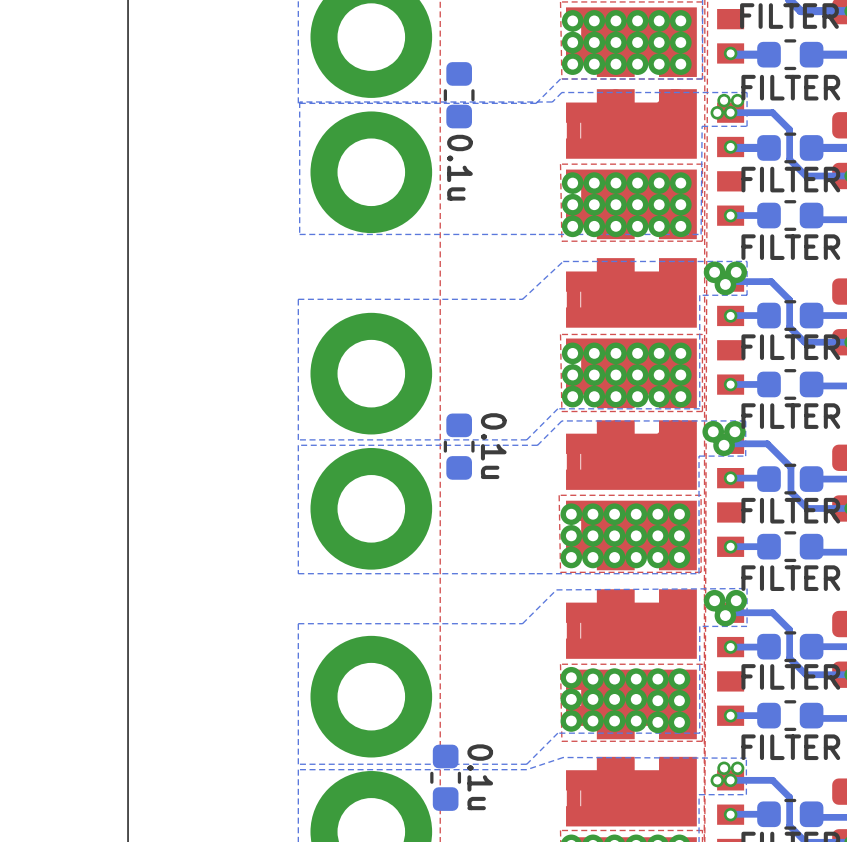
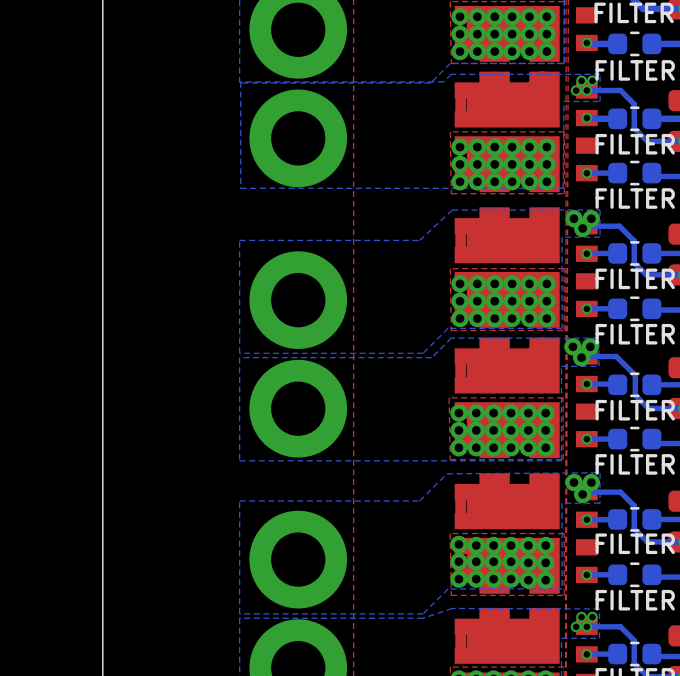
part: 0.1u (459, 95) -> none
part: 0.1u (459, 446) -> none
part: 0.1u (445, 777) -> none

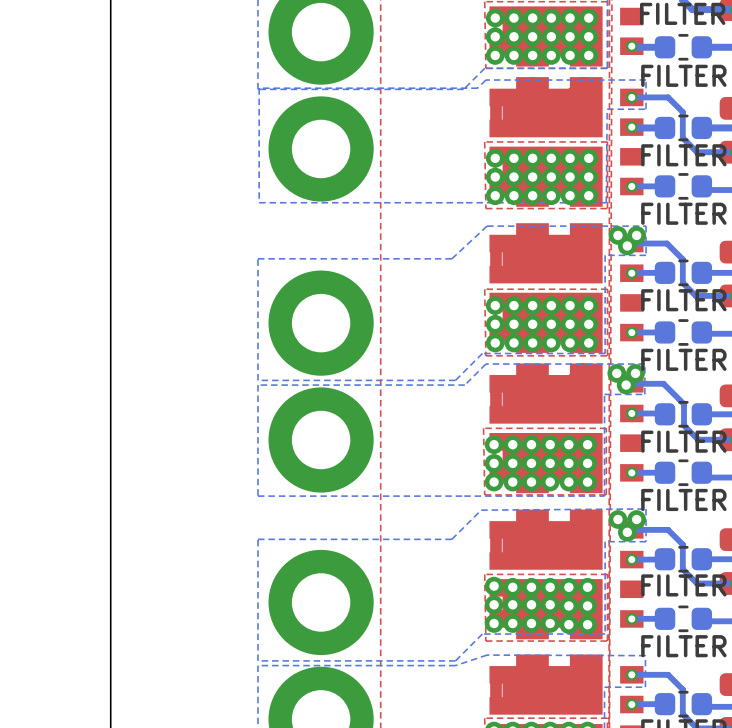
via: (581, 80) -> none
via: (592, 80) -> none
via: (576, 90) -> none
via: (581, 617) -> none
via: (592, 617) -> none
via: (576, 626) -> none

